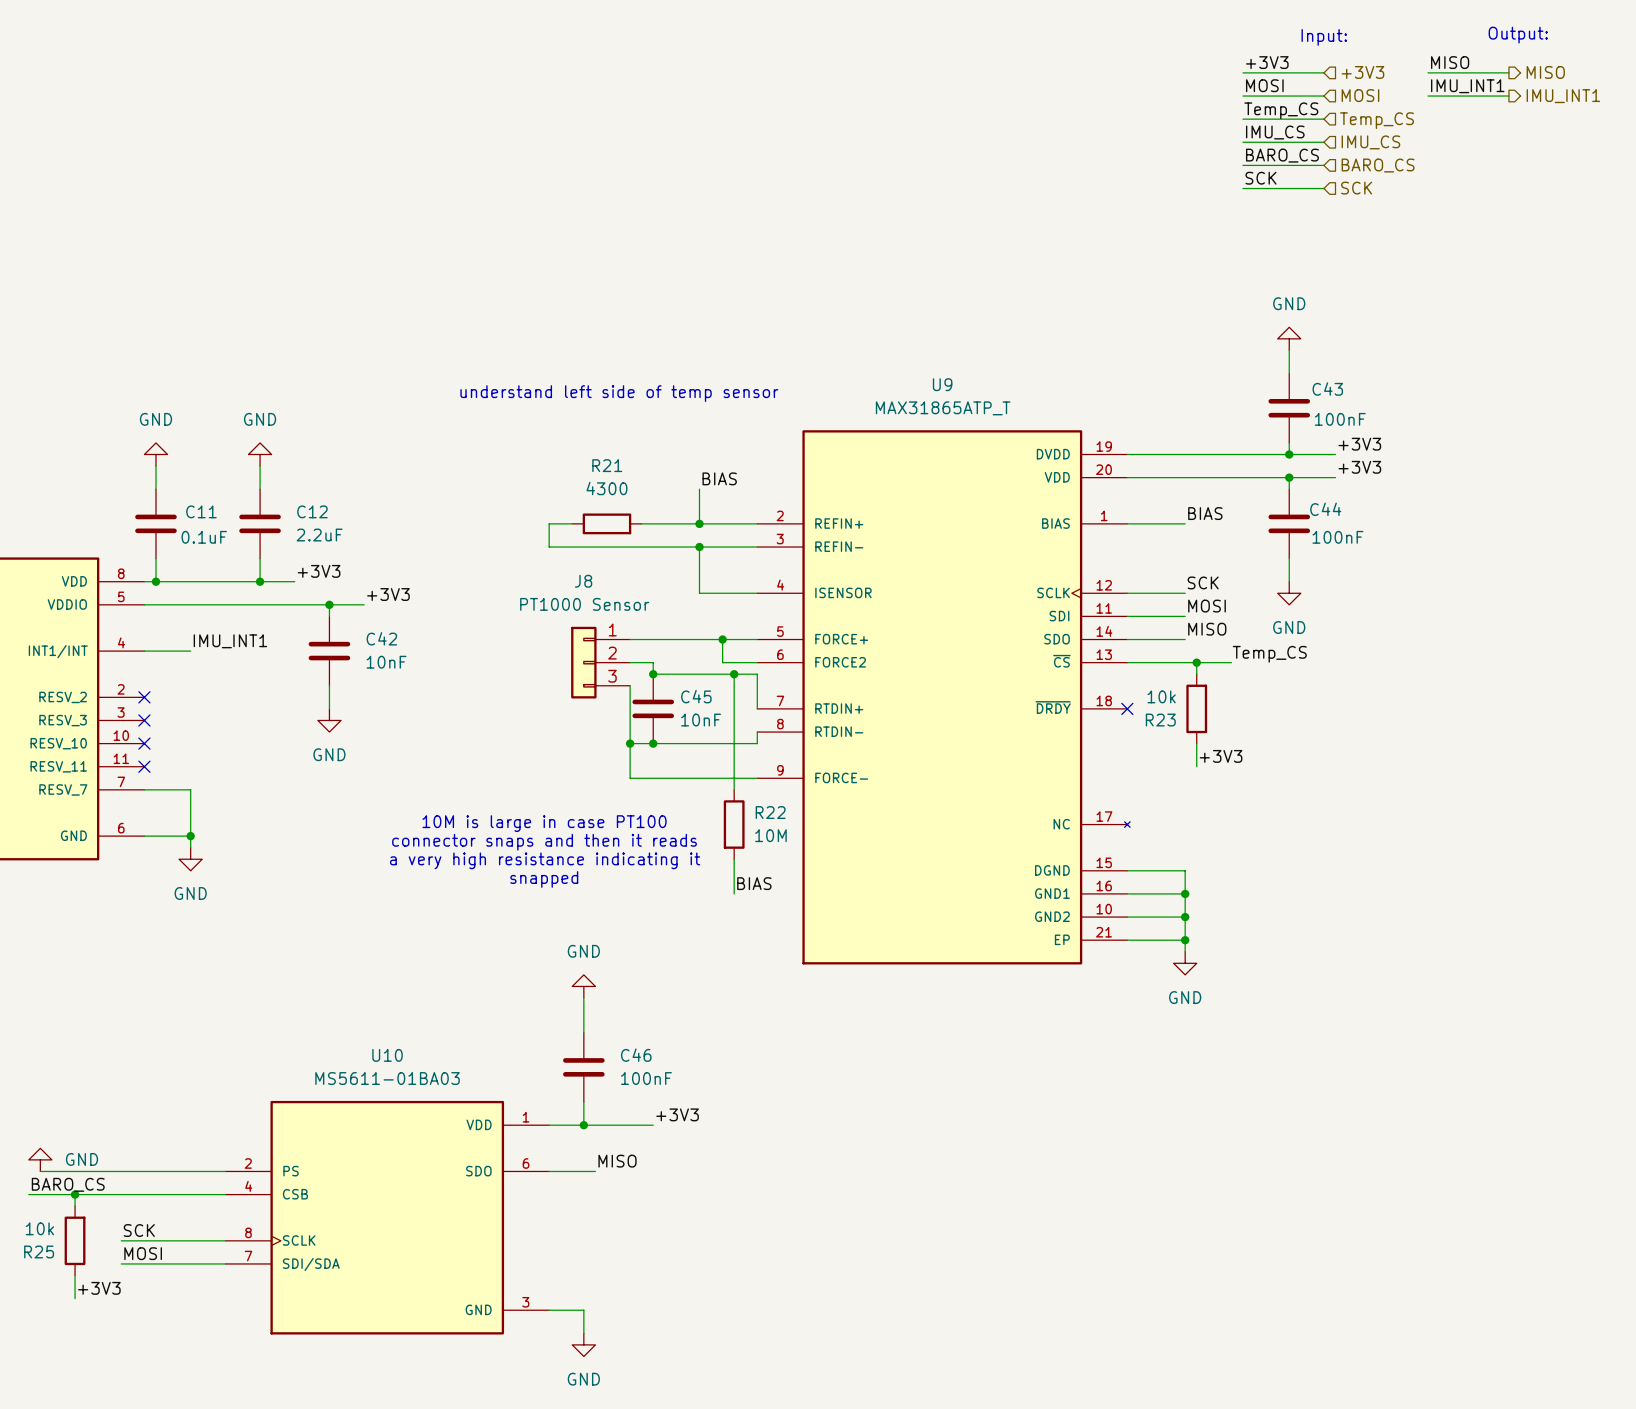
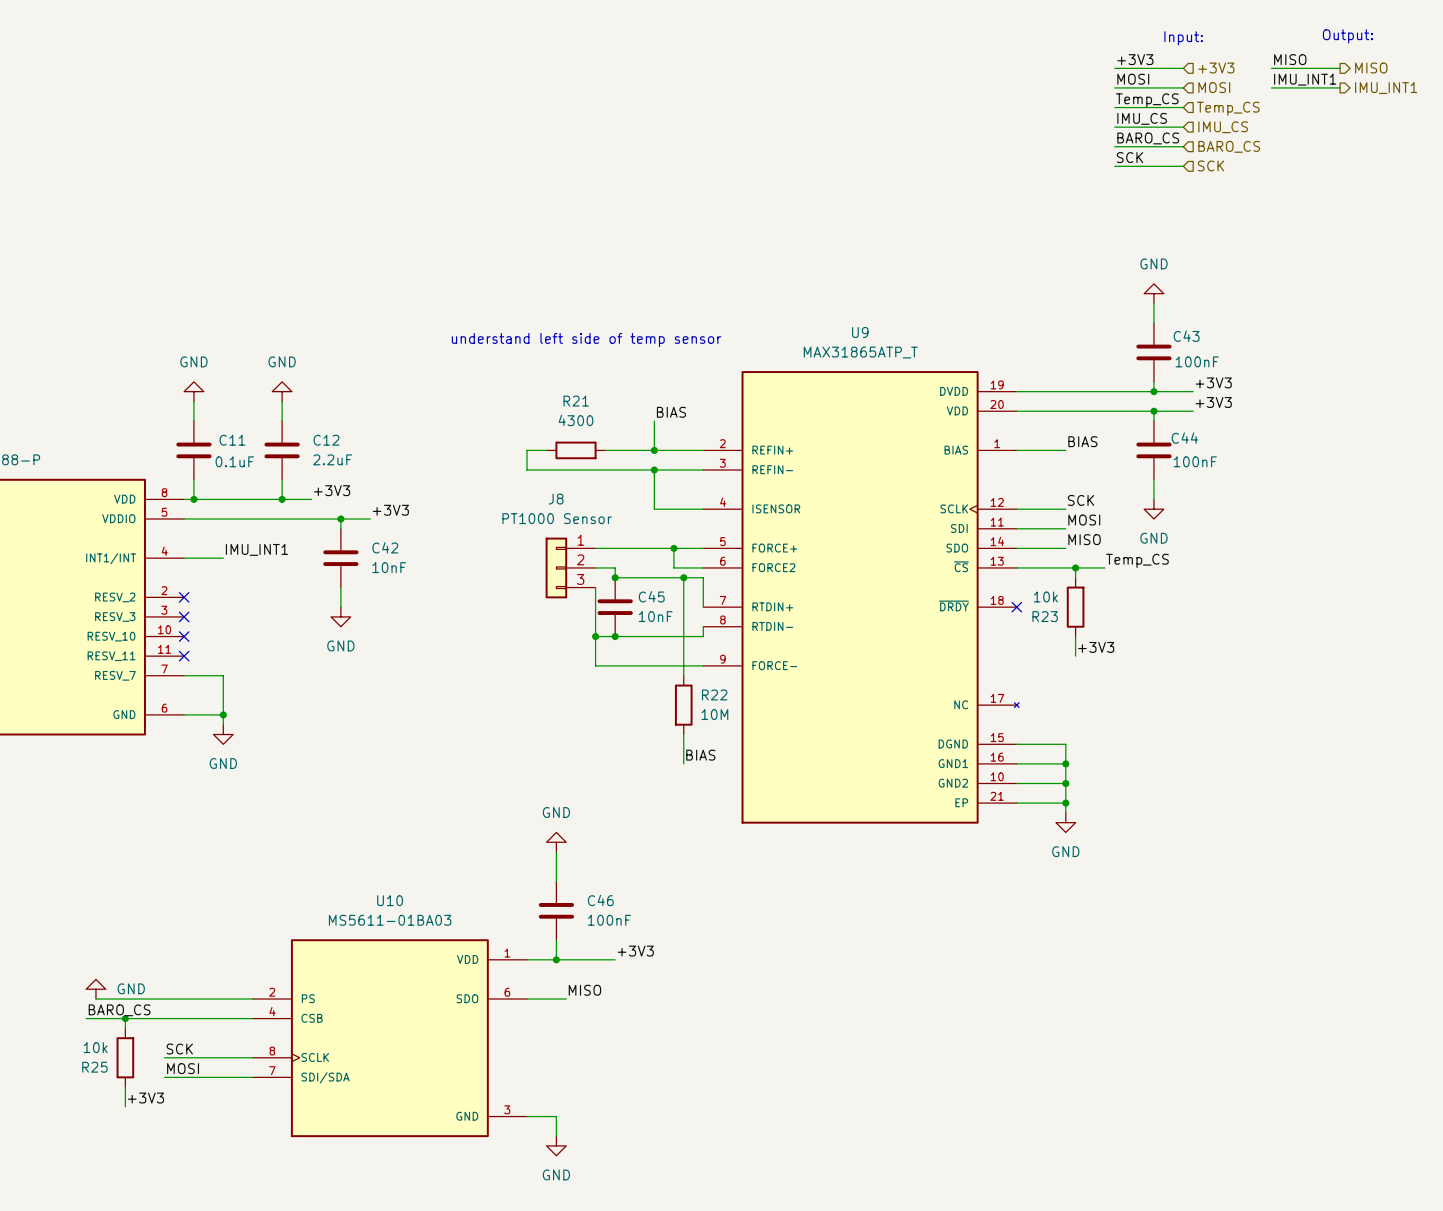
text: 10M is large in case PT100 (544, 823) -> none
text: connector snaps and then it reads (544, 842) -> none
text: a very high resistance indicating it (545, 860) -> none
text: snapped (544, 879) -> none

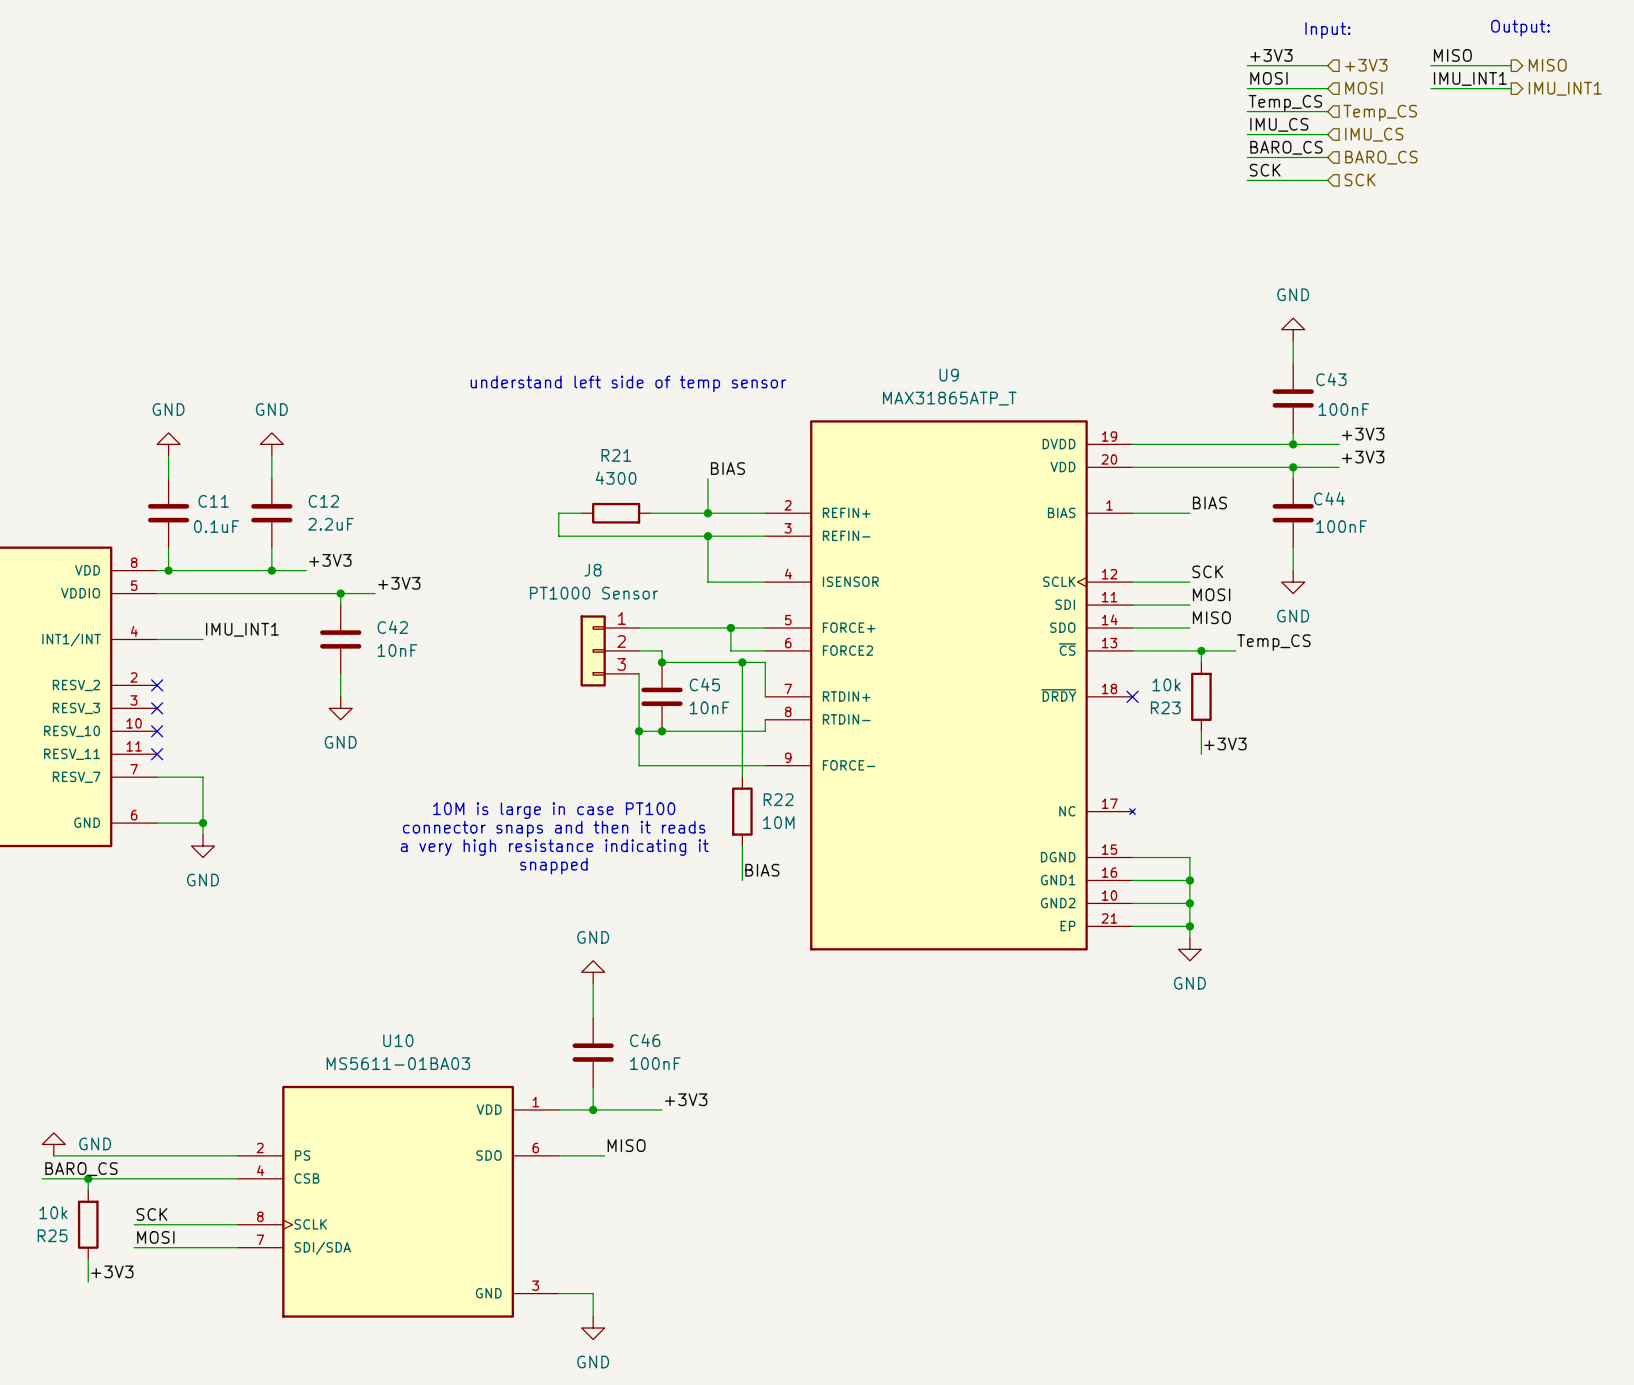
text: none -> 10M is large in case PT100 (554, 810)
text: none -> connector snaps and then it reads (554, 829)
text: none -> a very high resistance indicating it (554, 847)
text: none -> snapped (553, 866)

